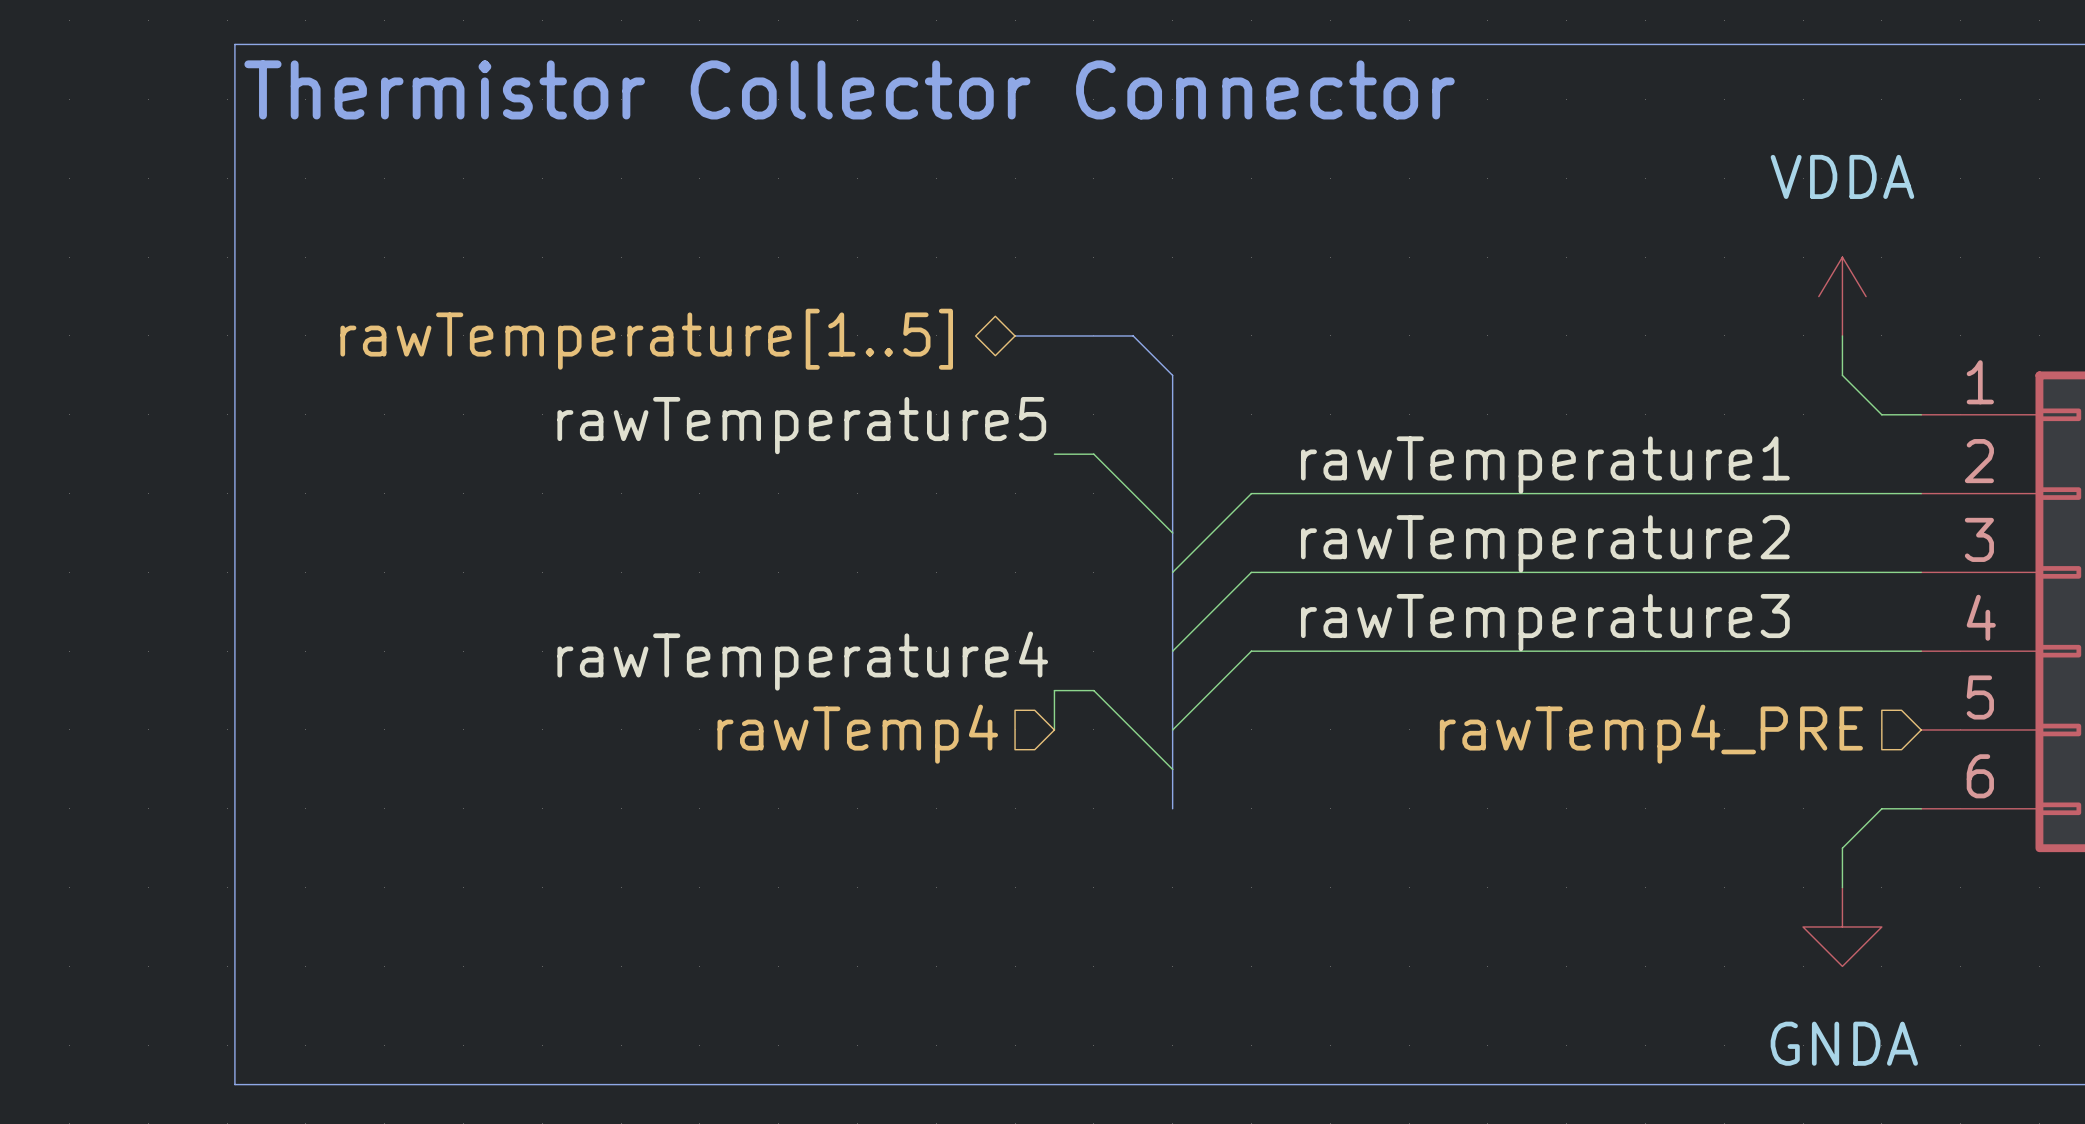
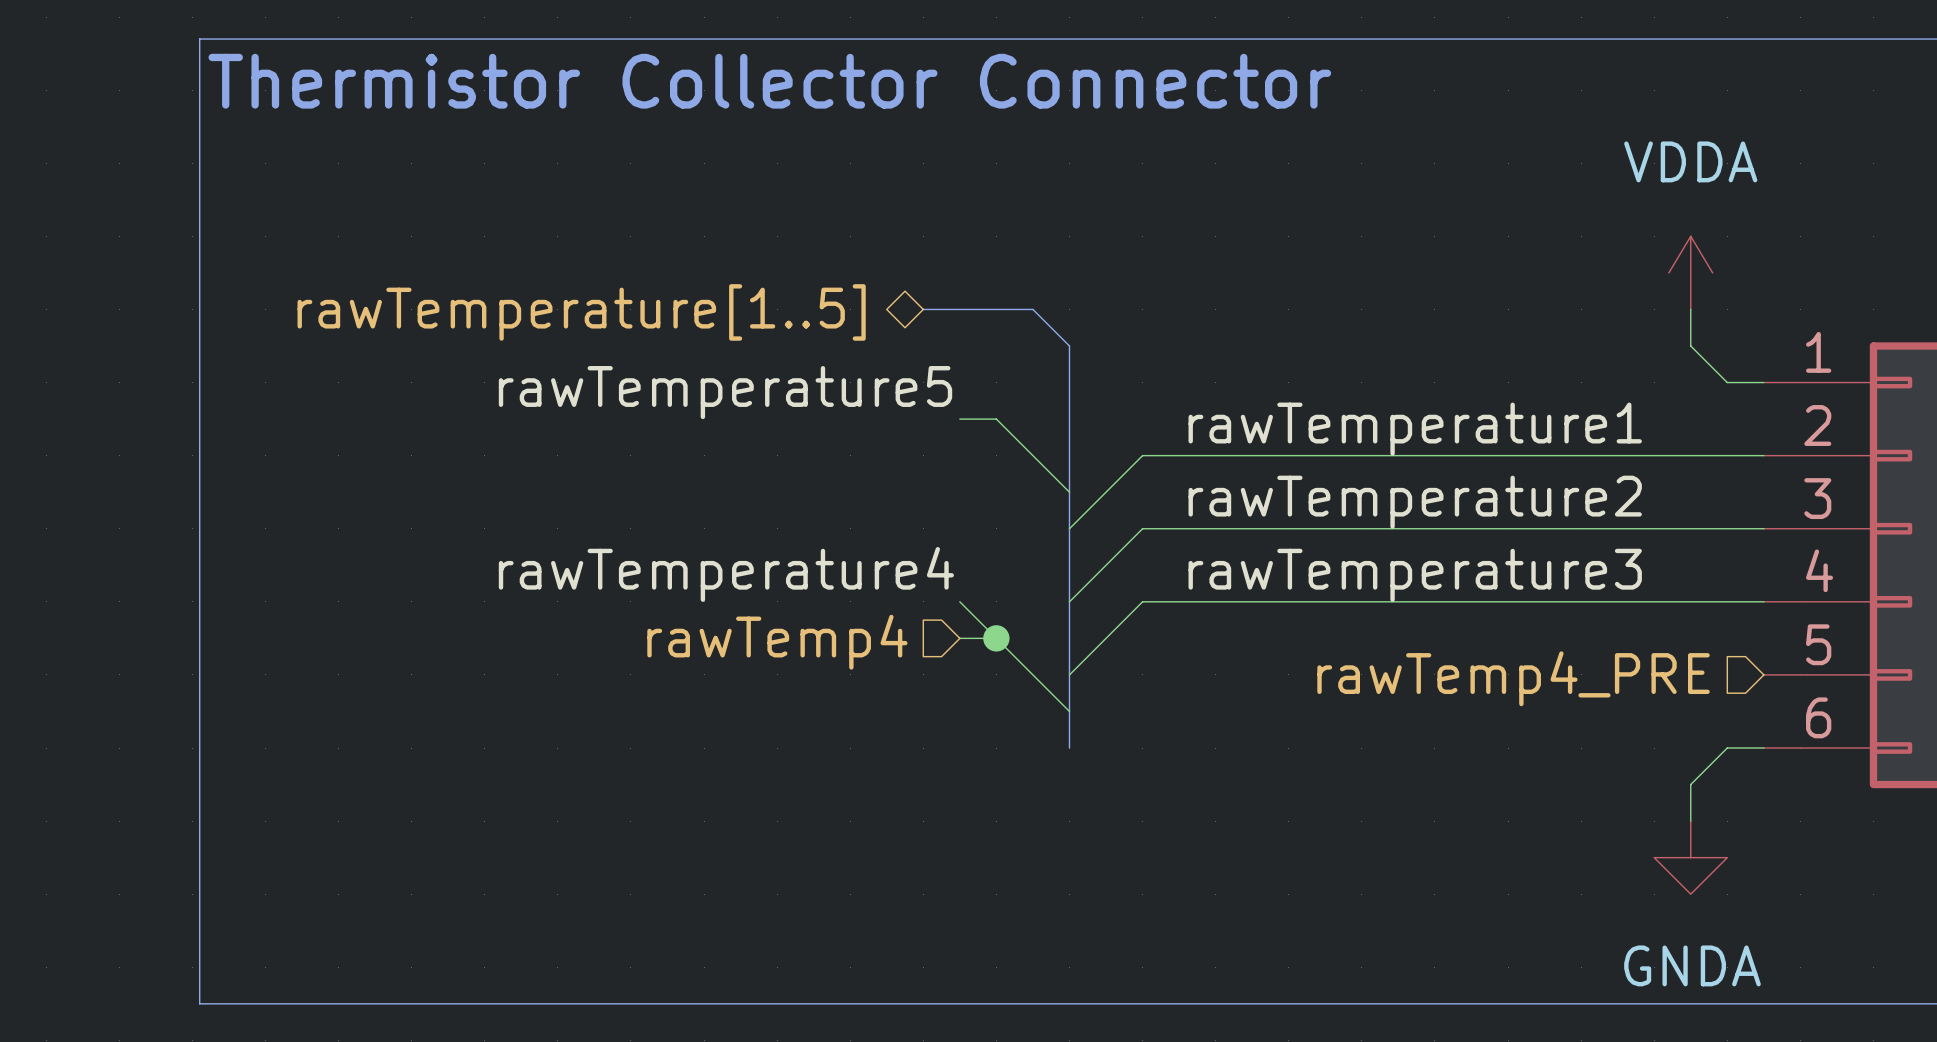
wire: none -> (959, 601) (996, 638)
label position: rawTemperature4 (802, 661) -> rawTemperature4 (726, 574)
wire: (1054, 690) (1054, 729) -> none
junction: none -> (996, 638)
hierarchical label position: rawTemp4 (857, 734) -> rawTemp4 (777, 642)

